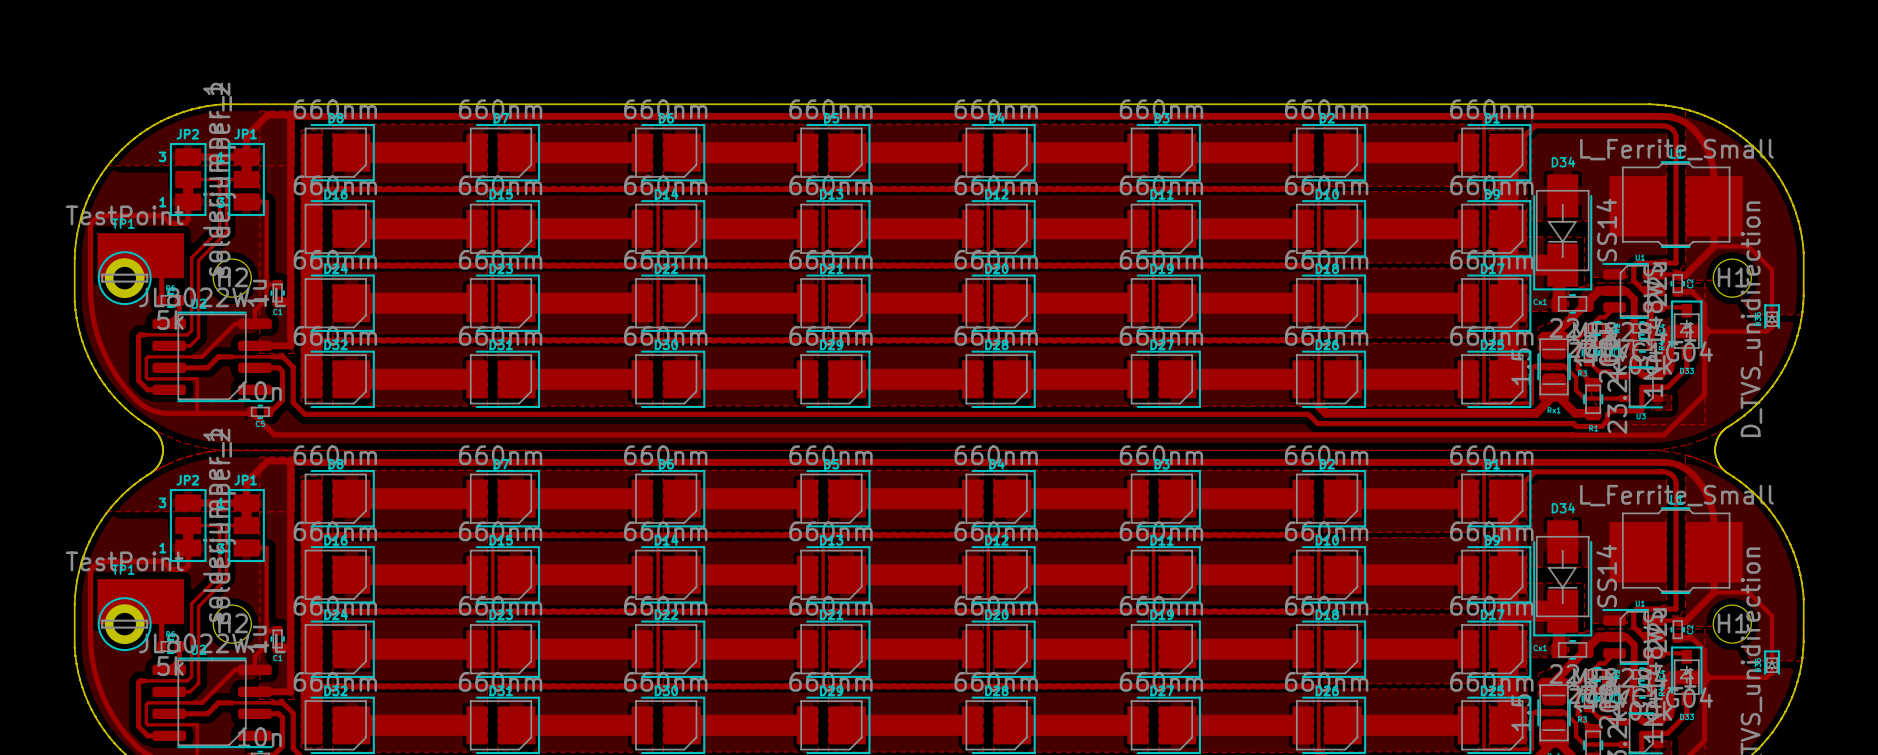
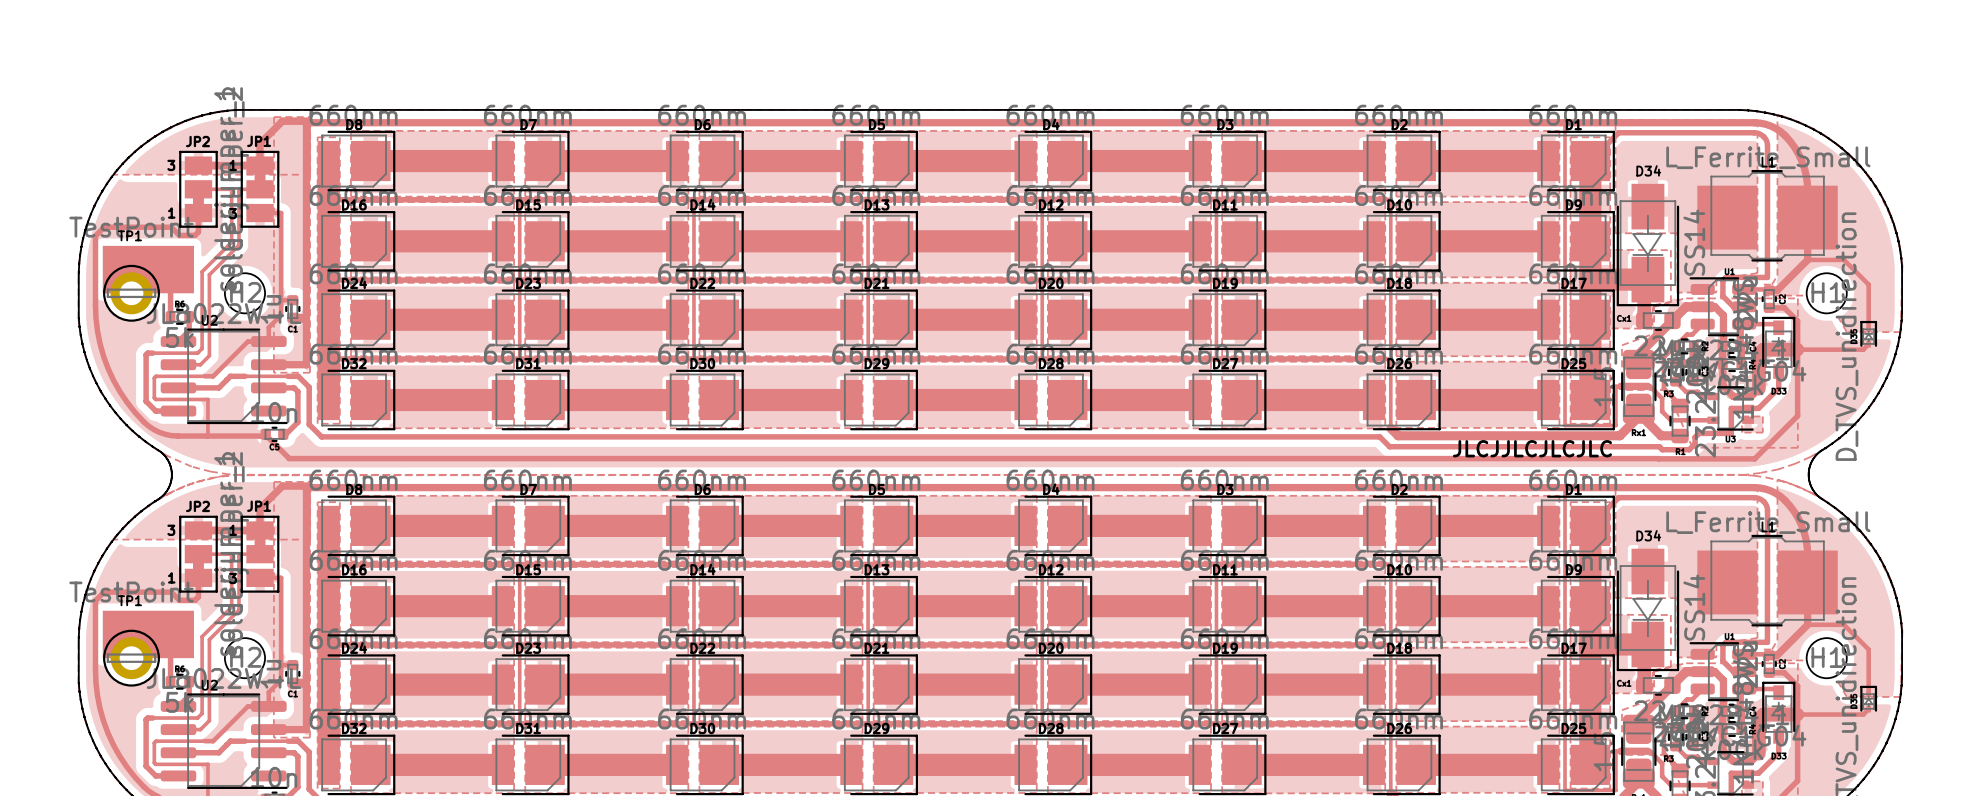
text: none -> JLCJJLCJLCJLC (1532, 448)

